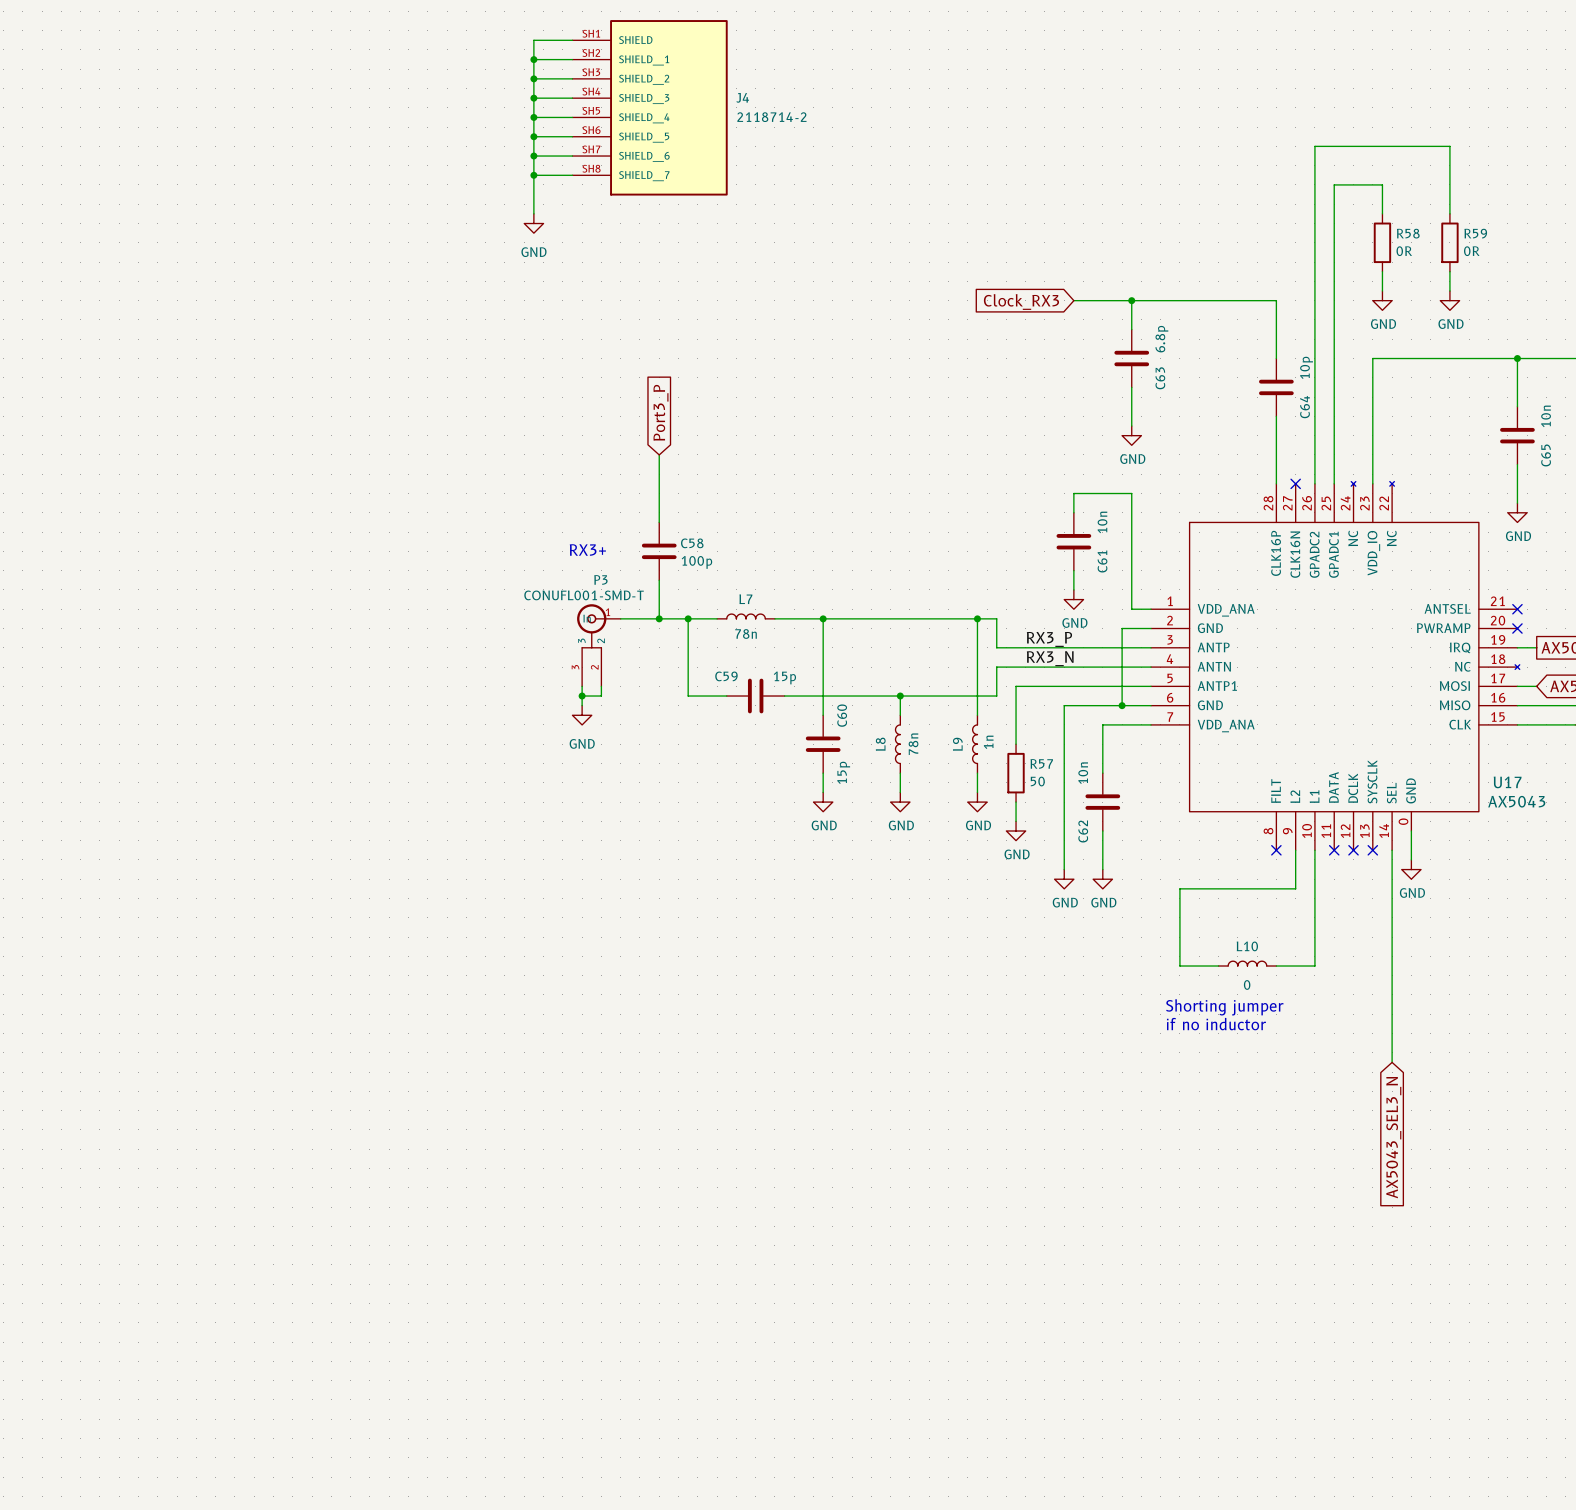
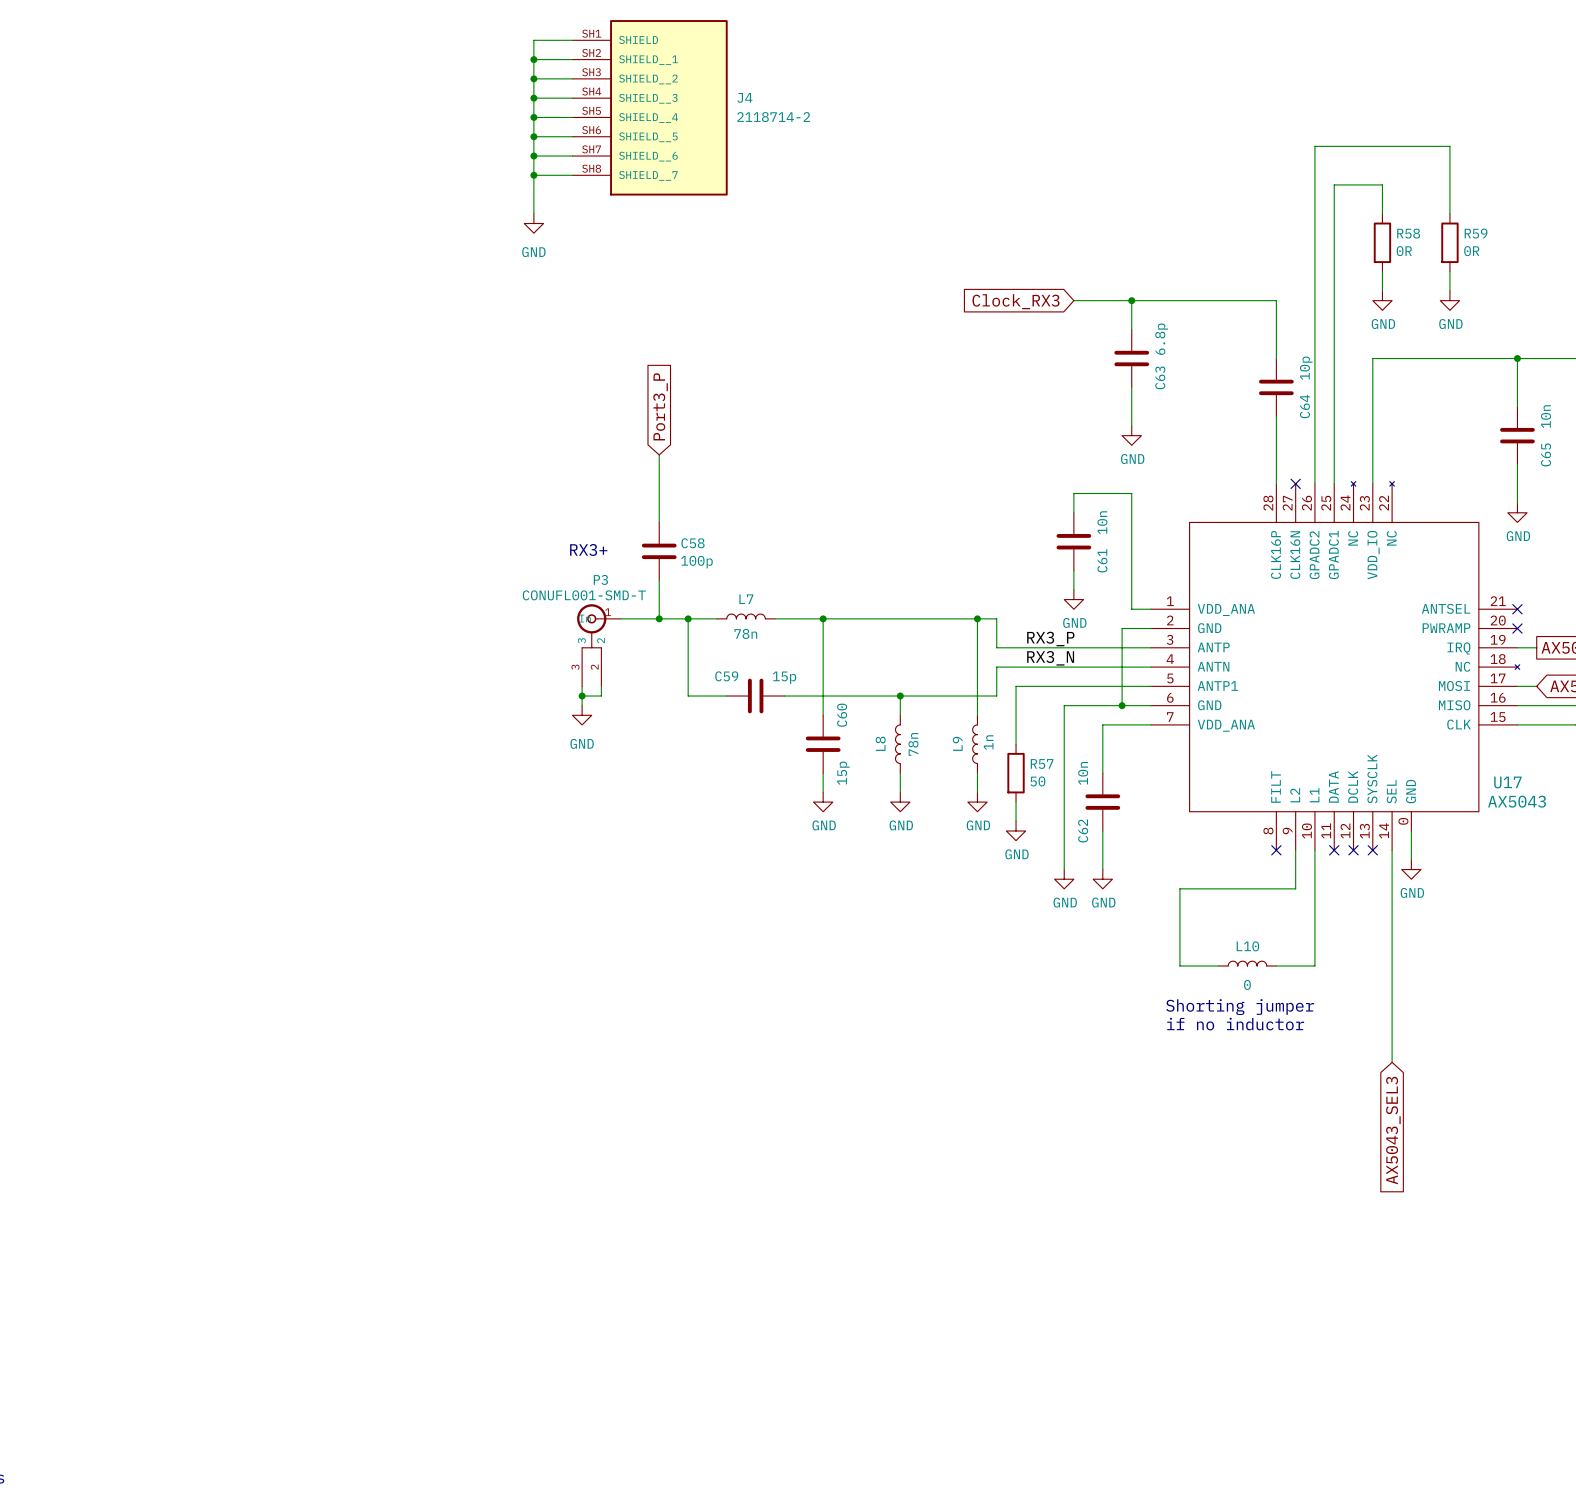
global label: AX5043_SEL3_N (1393, 1137) -> AX5043_SEL3 (1393, 1130)

